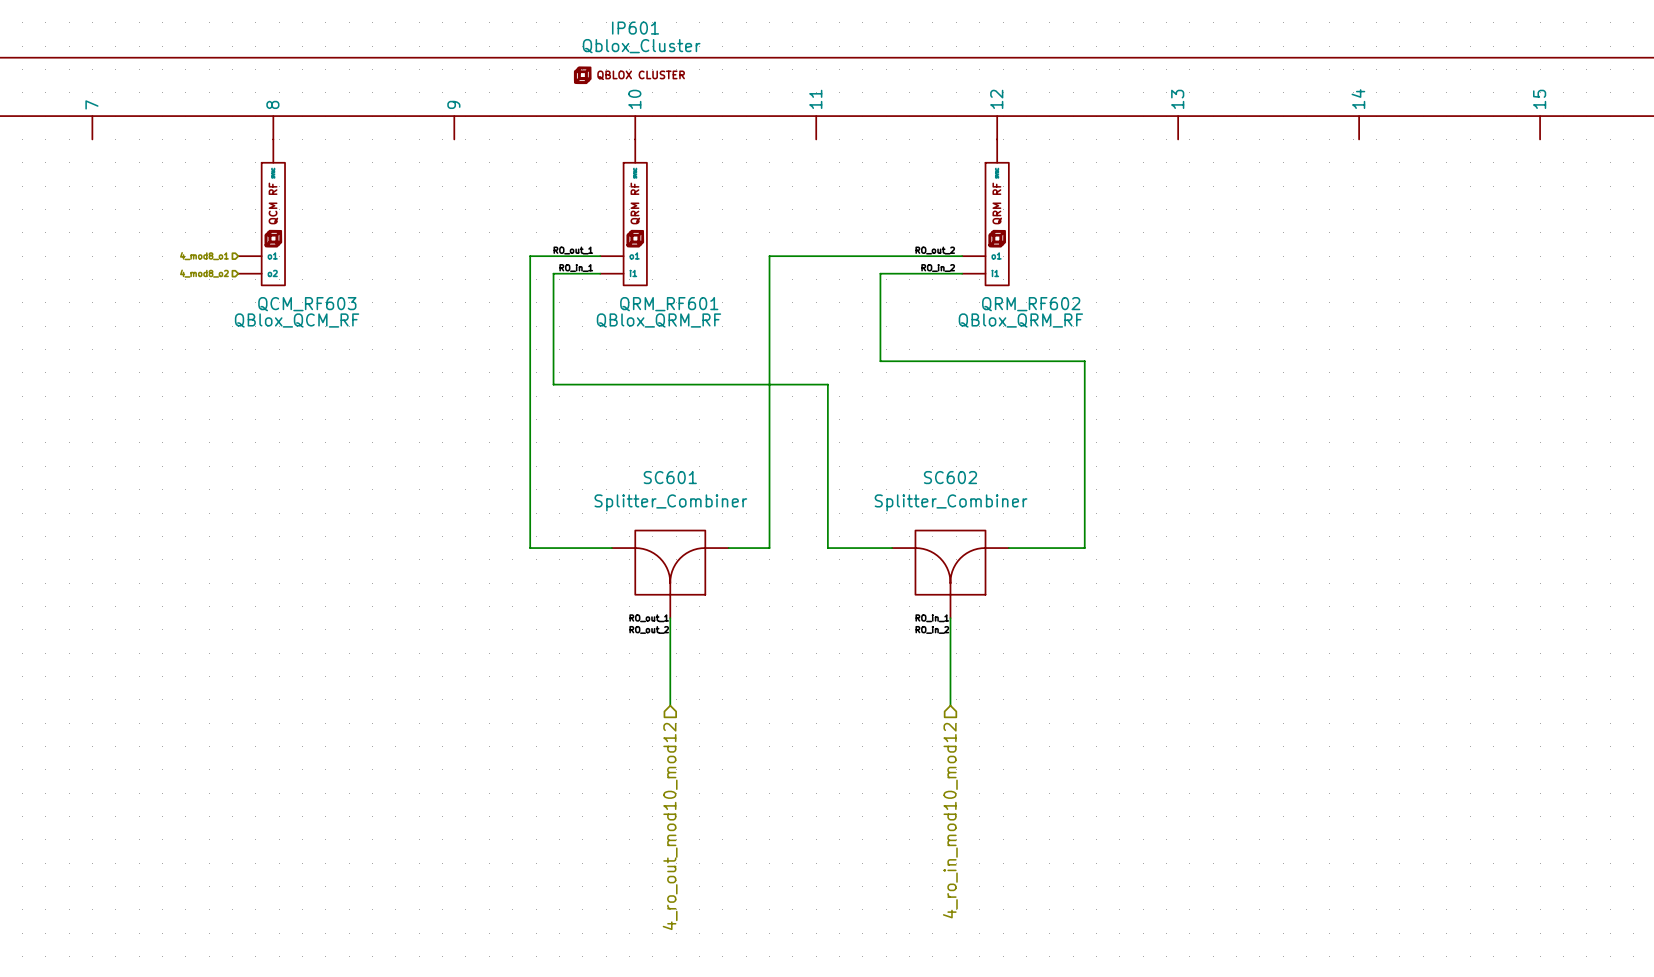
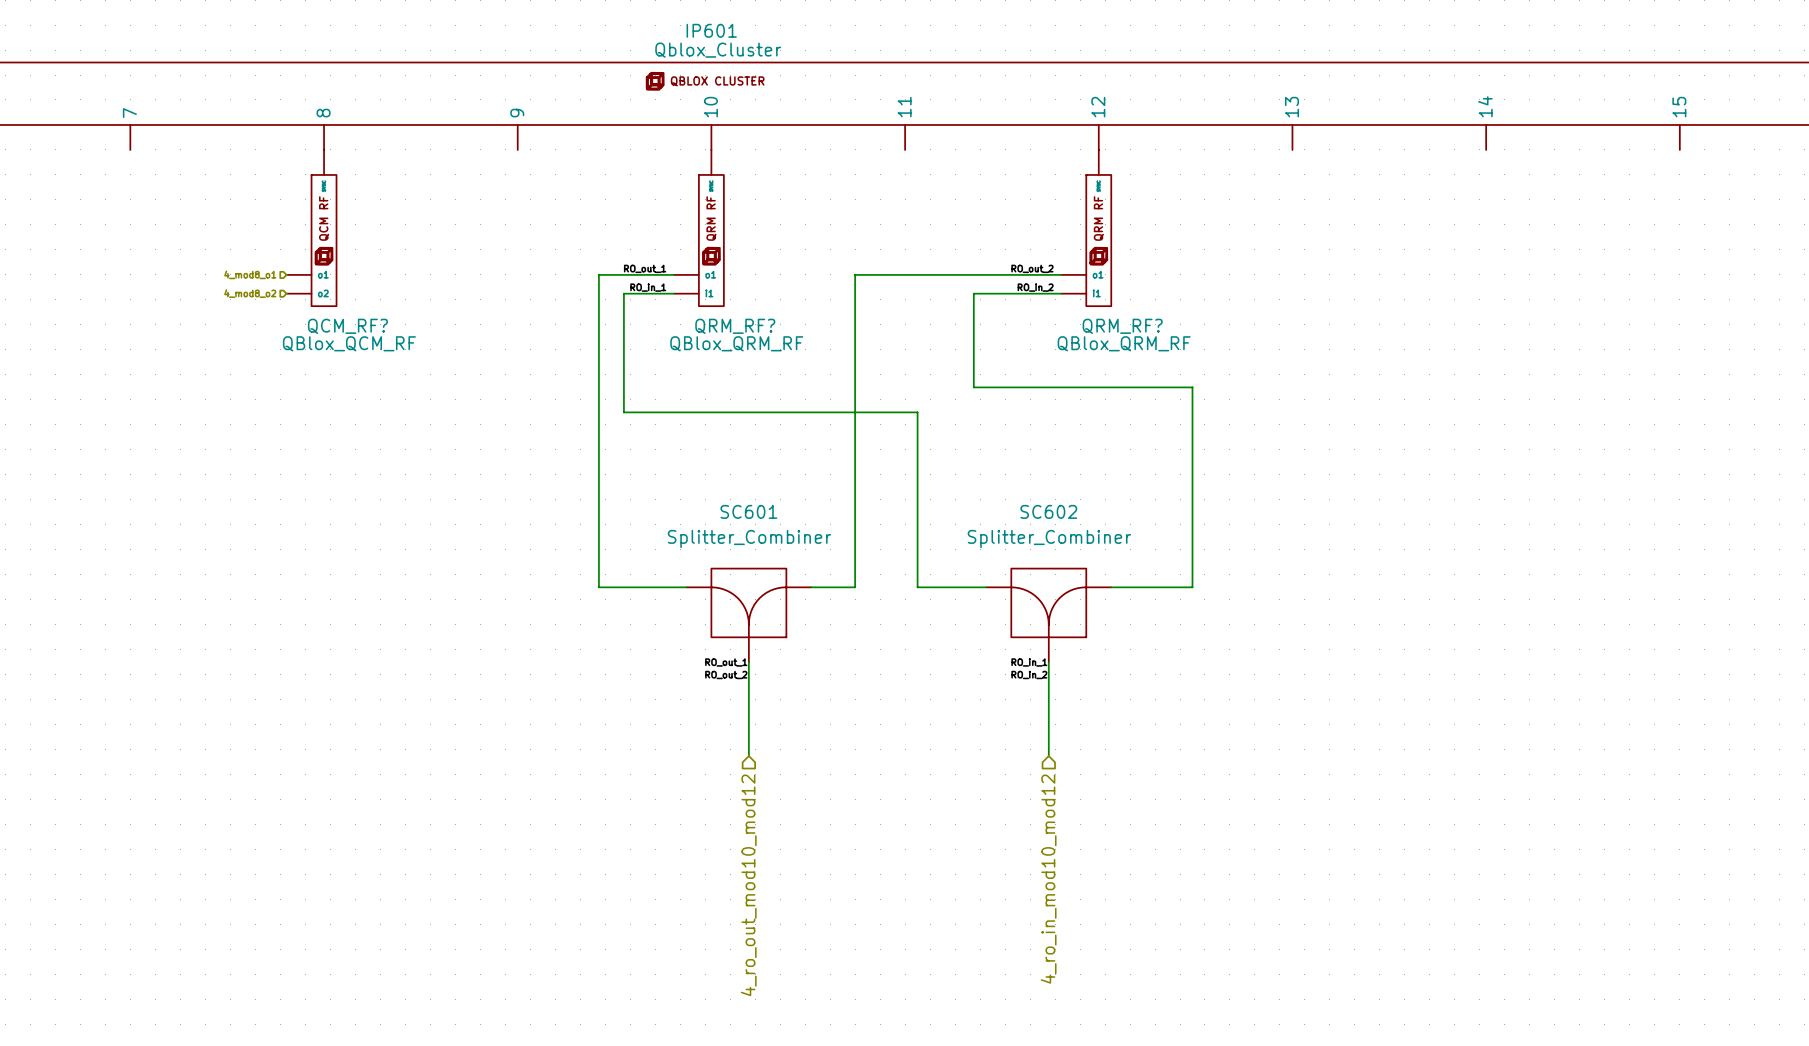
QCM_RF603 name: QCM_RF603 (307, 304) -> QCM_RF? (347, 326)
QRM_RF601 name: QRM_RF601 (669, 304) -> QRM_RF? (735, 326)
QRM_RF602 name: QRM_RF602 (1031, 304) -> QRM_RF? (1122, 326)

